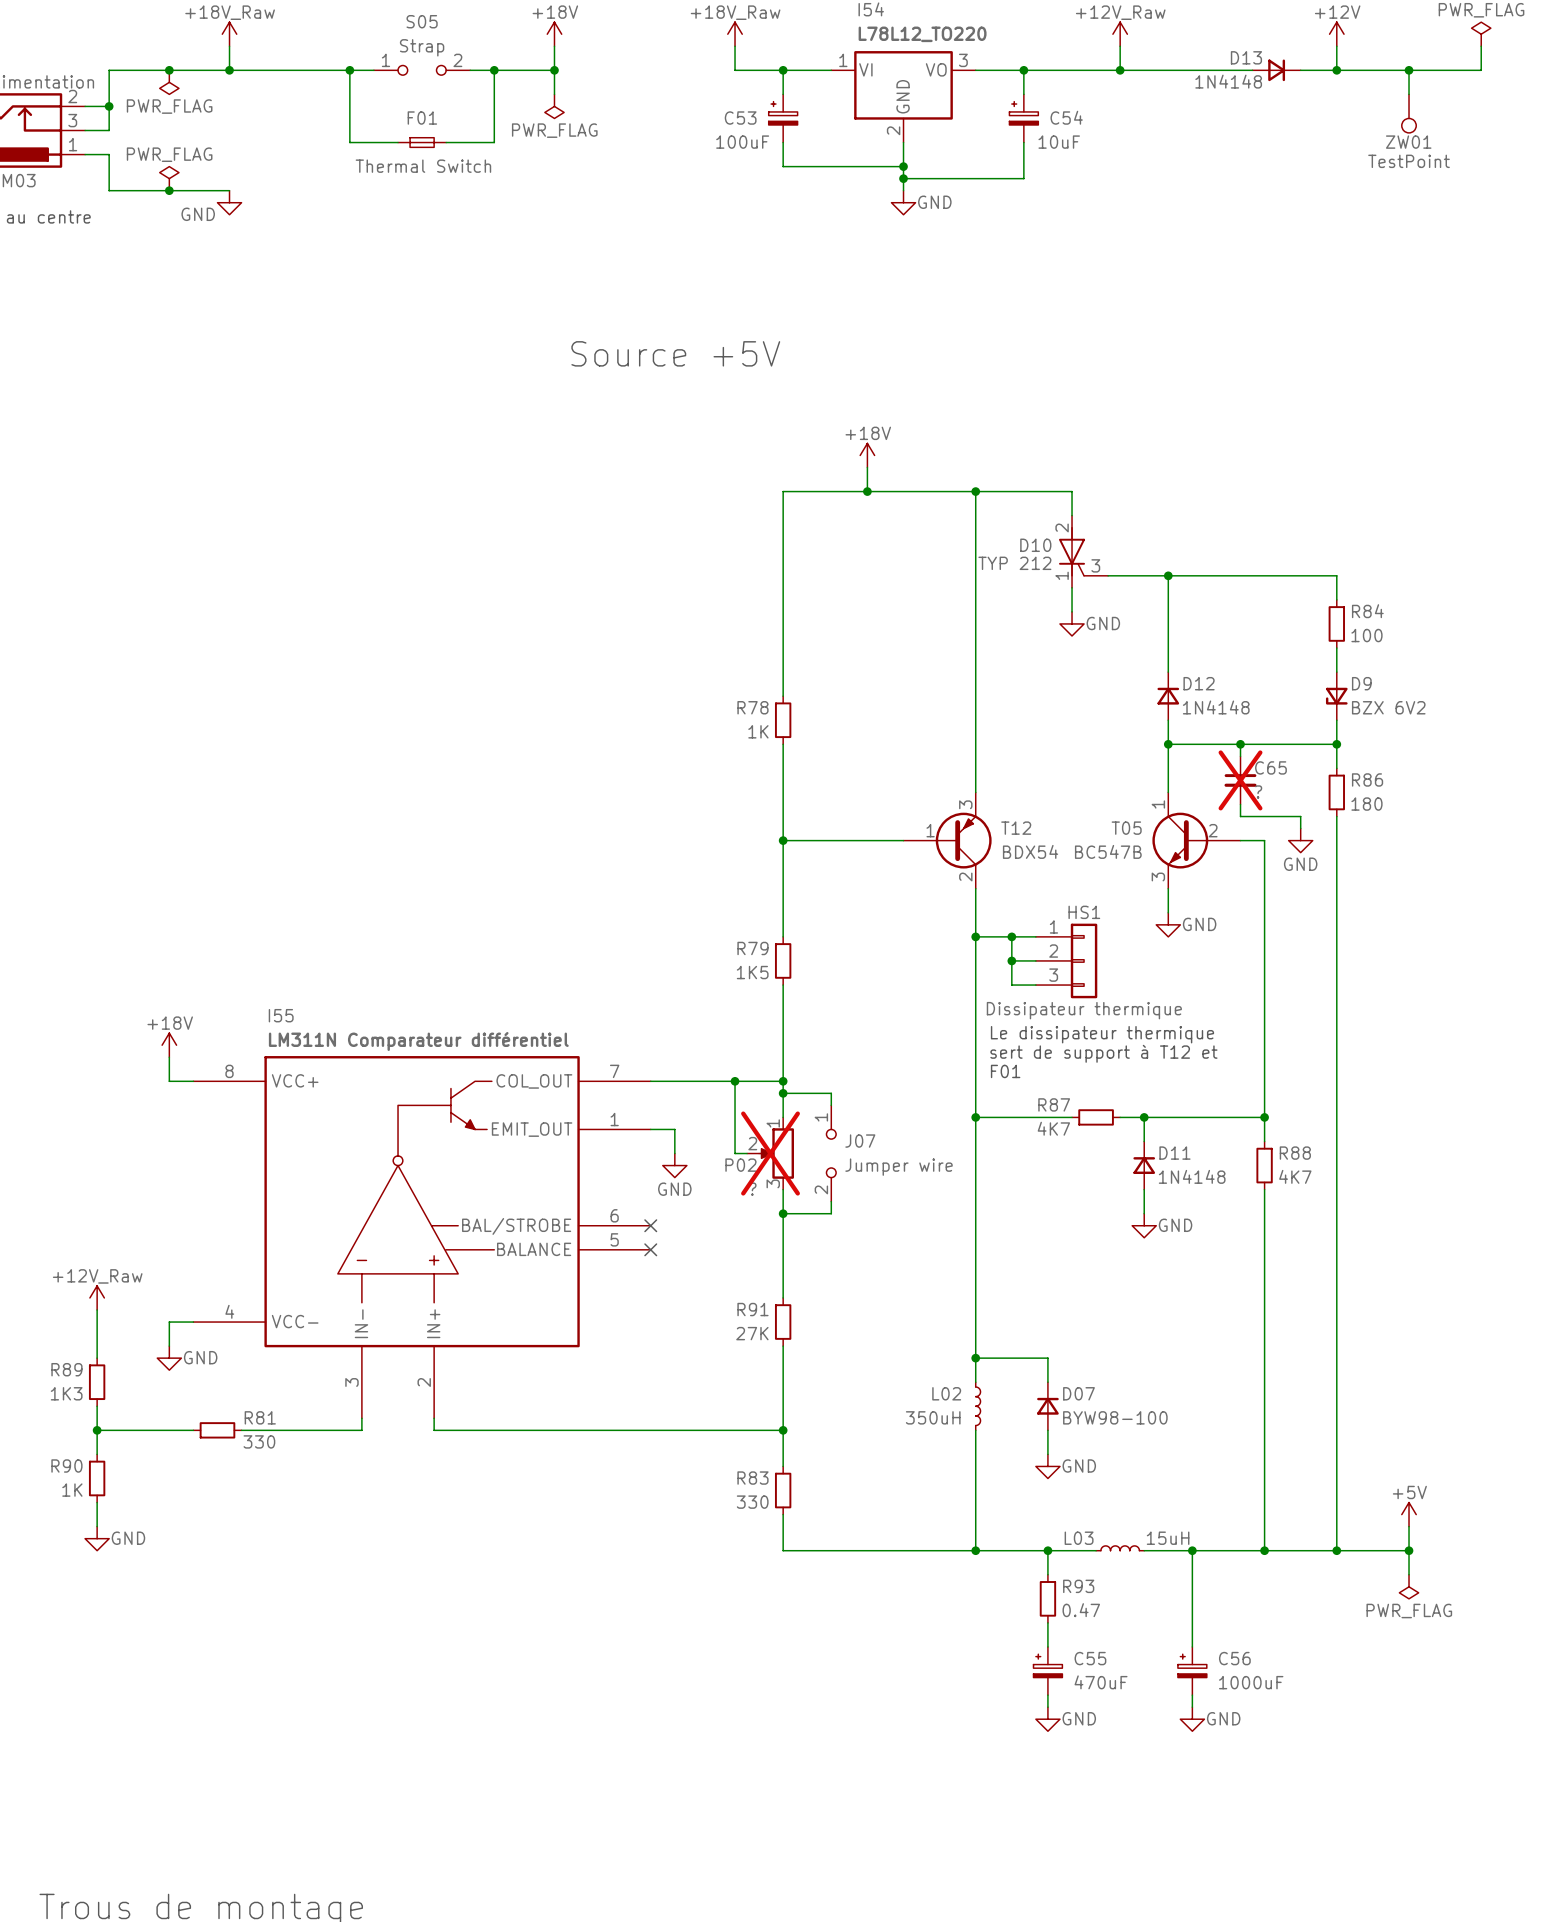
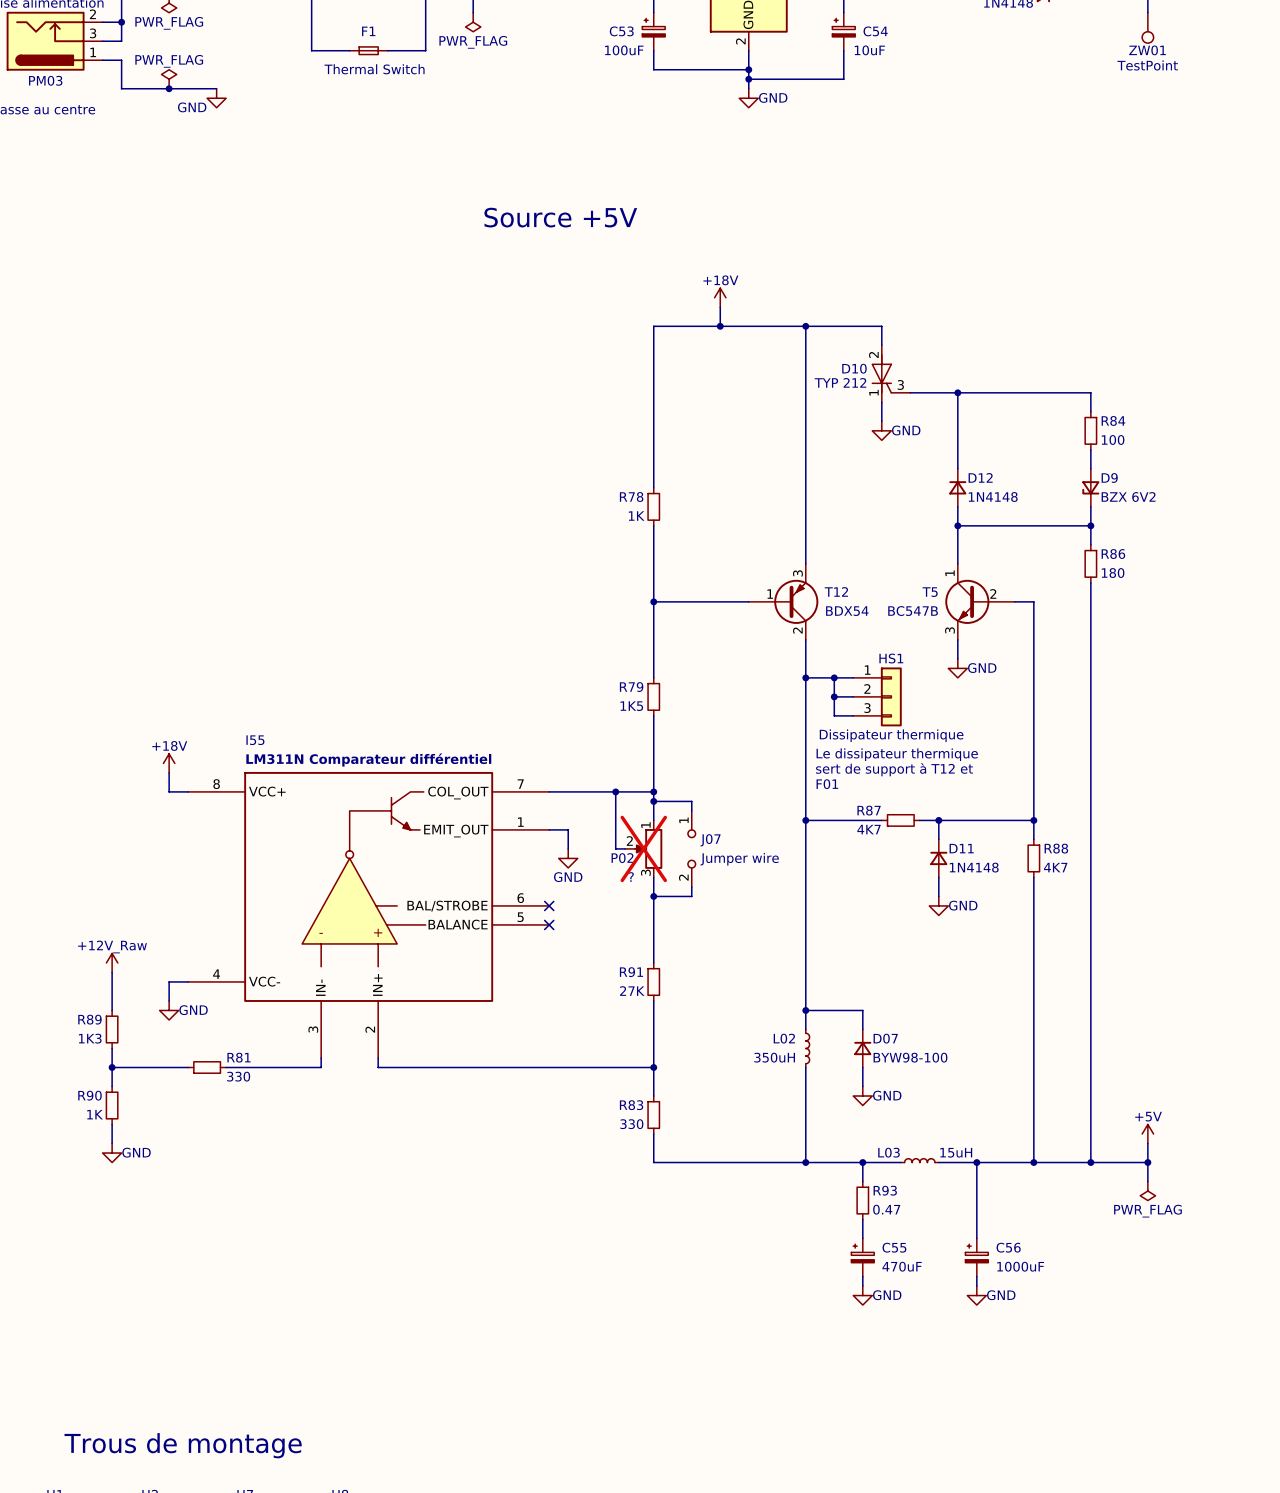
F01 name: F01 (422, 118) -> F1 (368, 31)
wire: (1240, 744) (1240, 756) -> none
junction: (1240, 744) -> none
C65: ? (1240, 780) -> none
wire: (1240, 804) (1240, 816) (1300, 816) (1300, 828) -> none
T05 name: T05 (1126, 828) -> T5 (930, 592)
power symbol: GND (1300, 840) -> none

